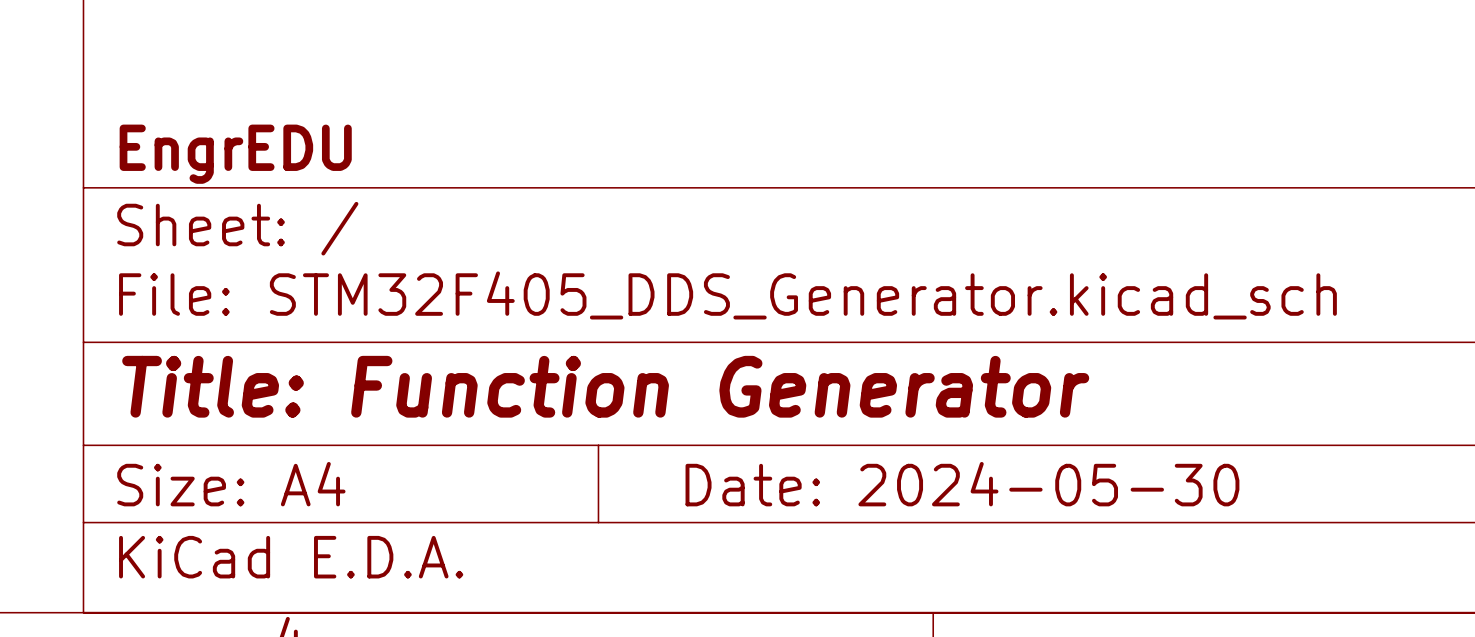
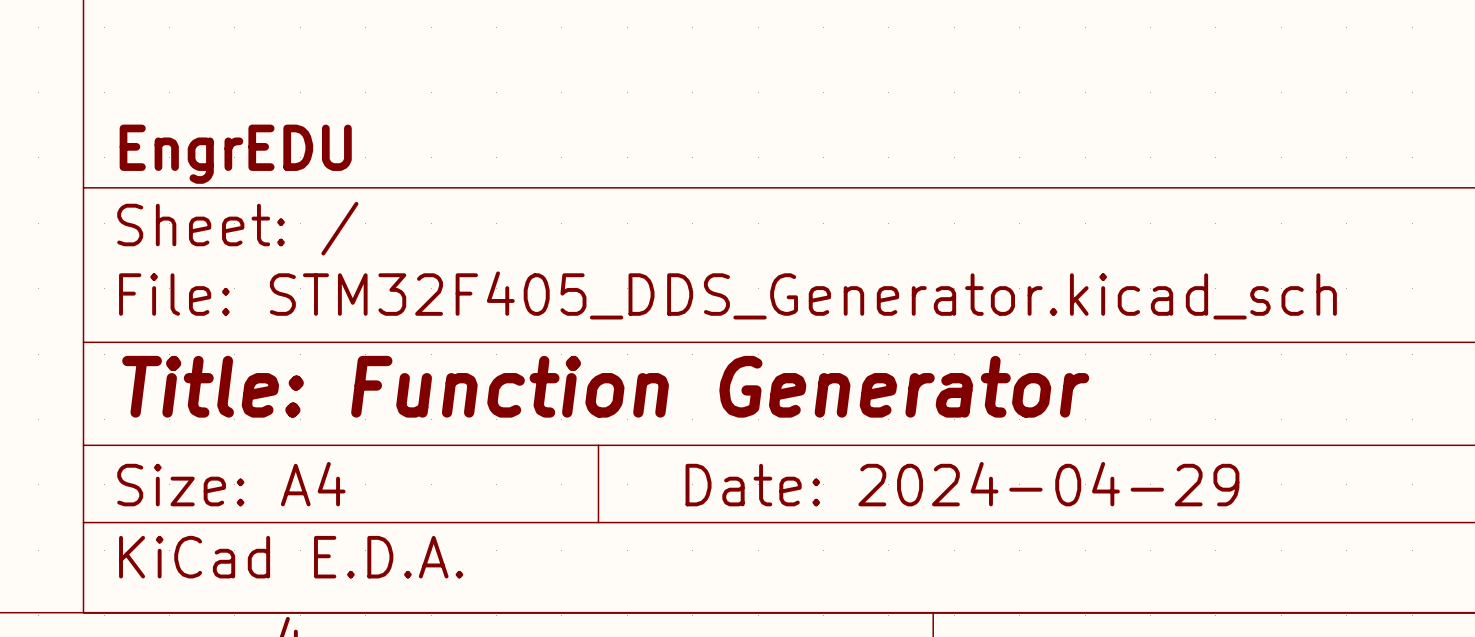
title block: Date: 2024-05-30 (962, 484) -> Date: 2024-04-29 (962, 484)

